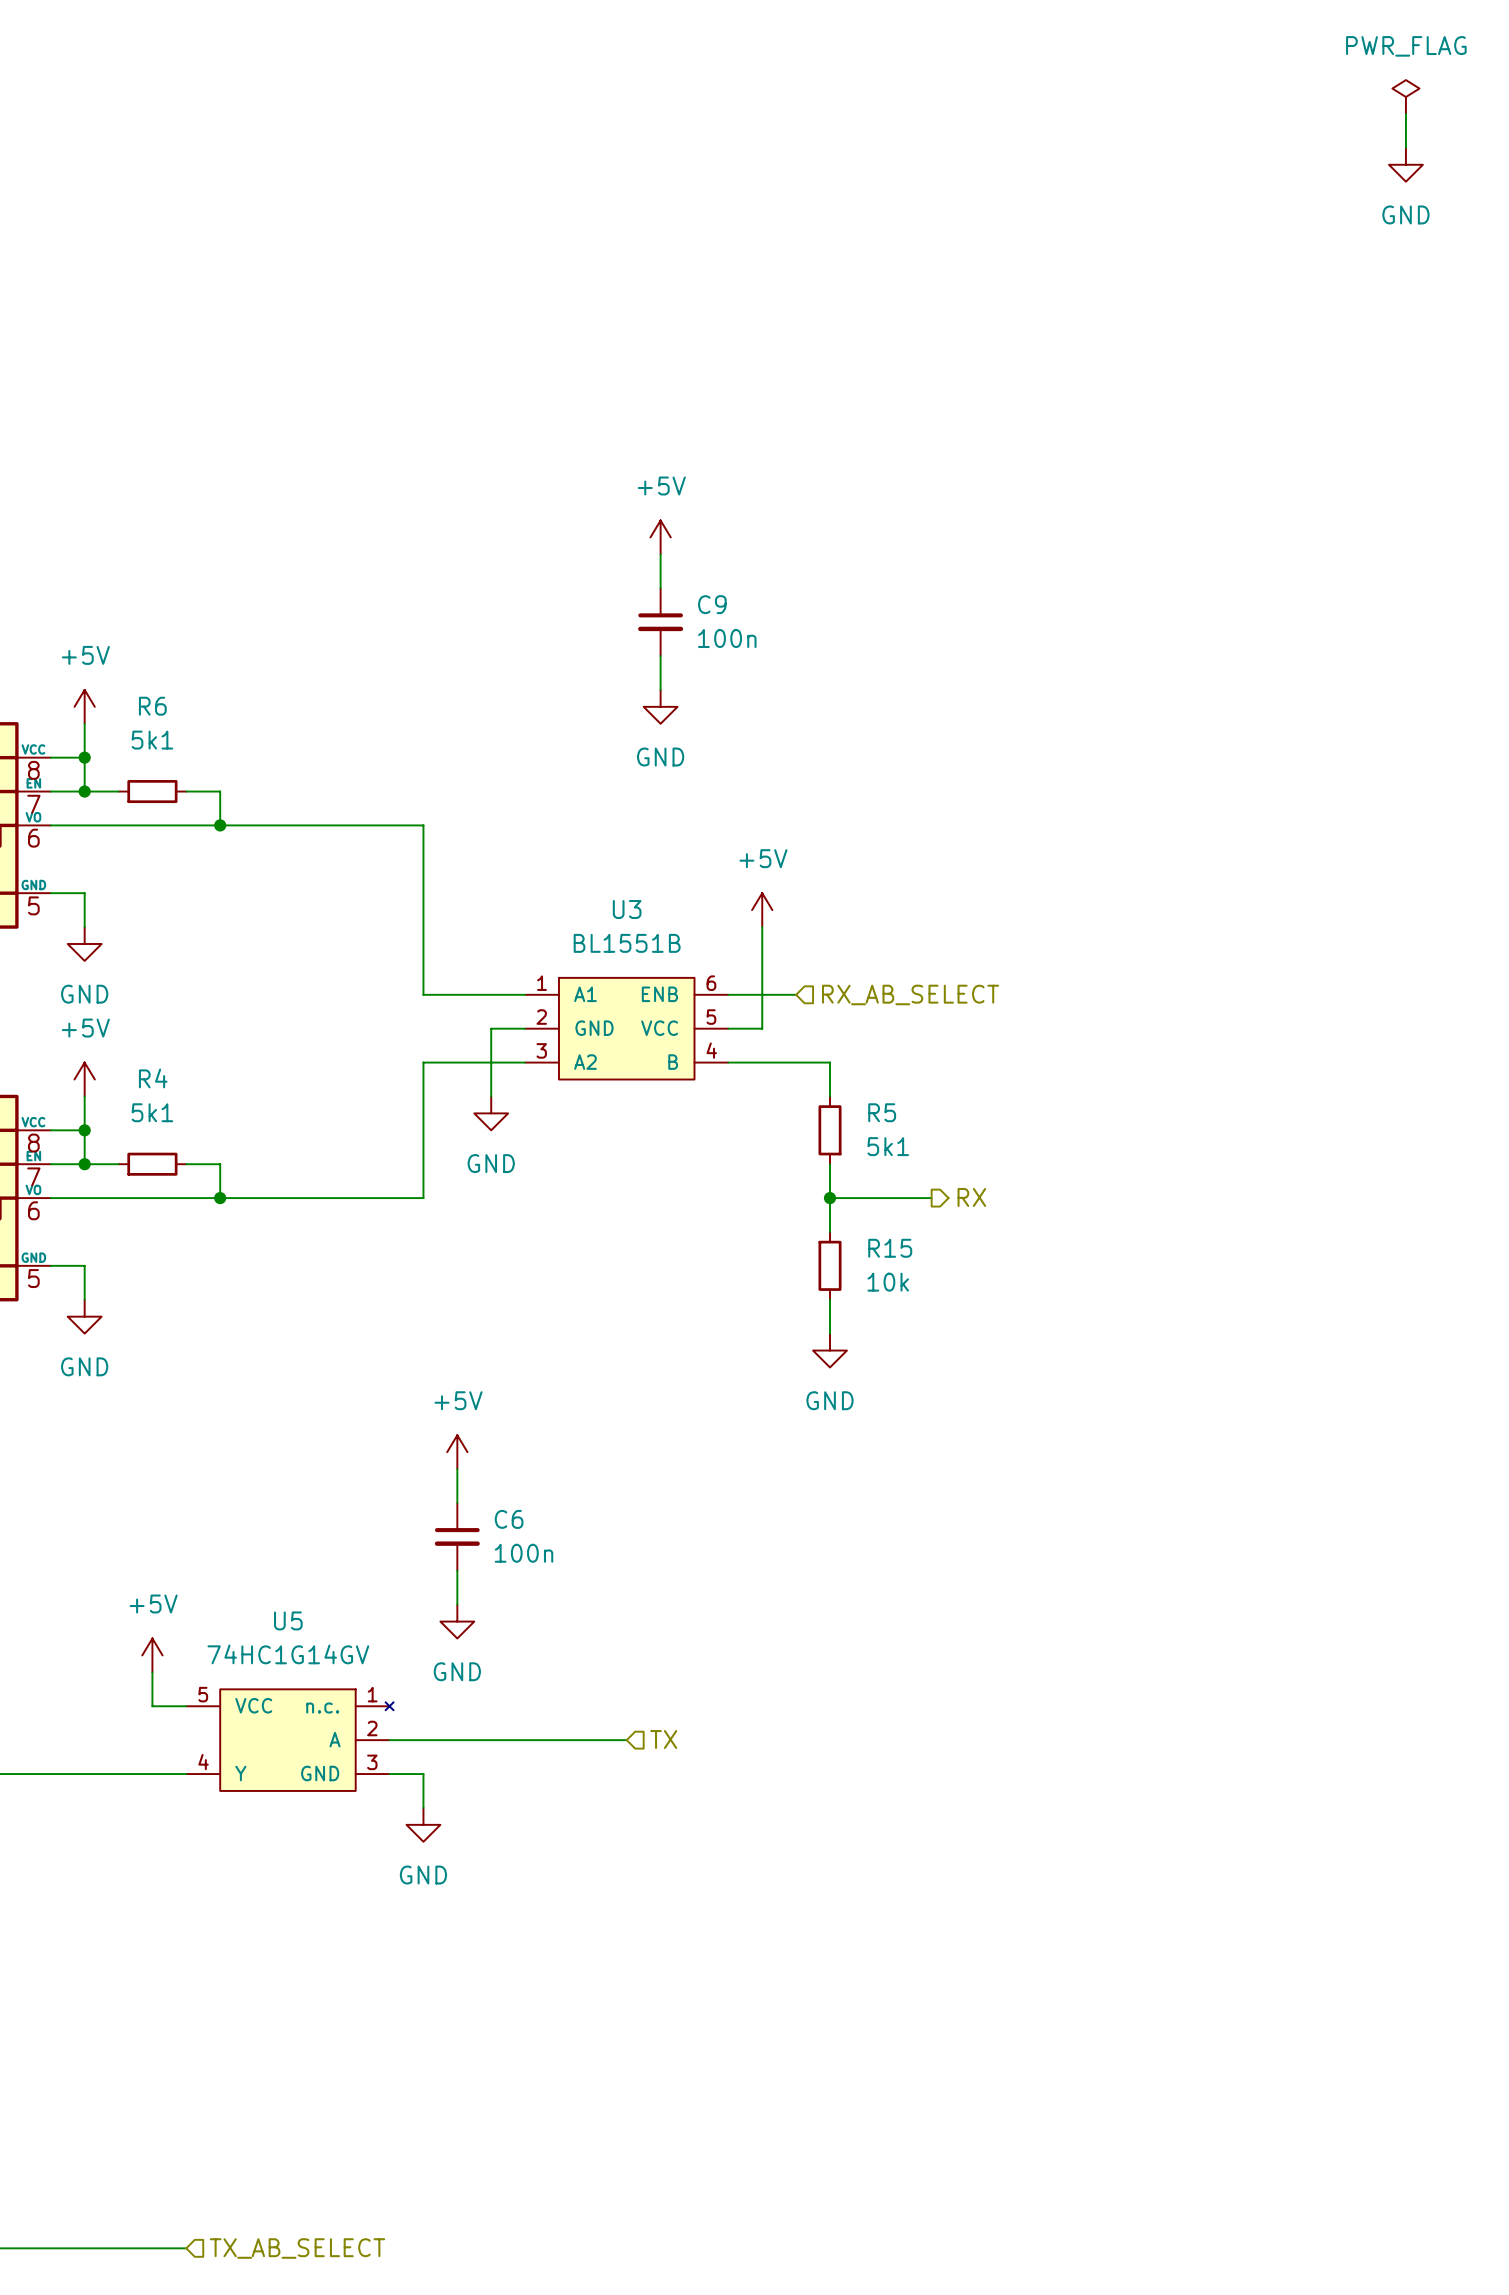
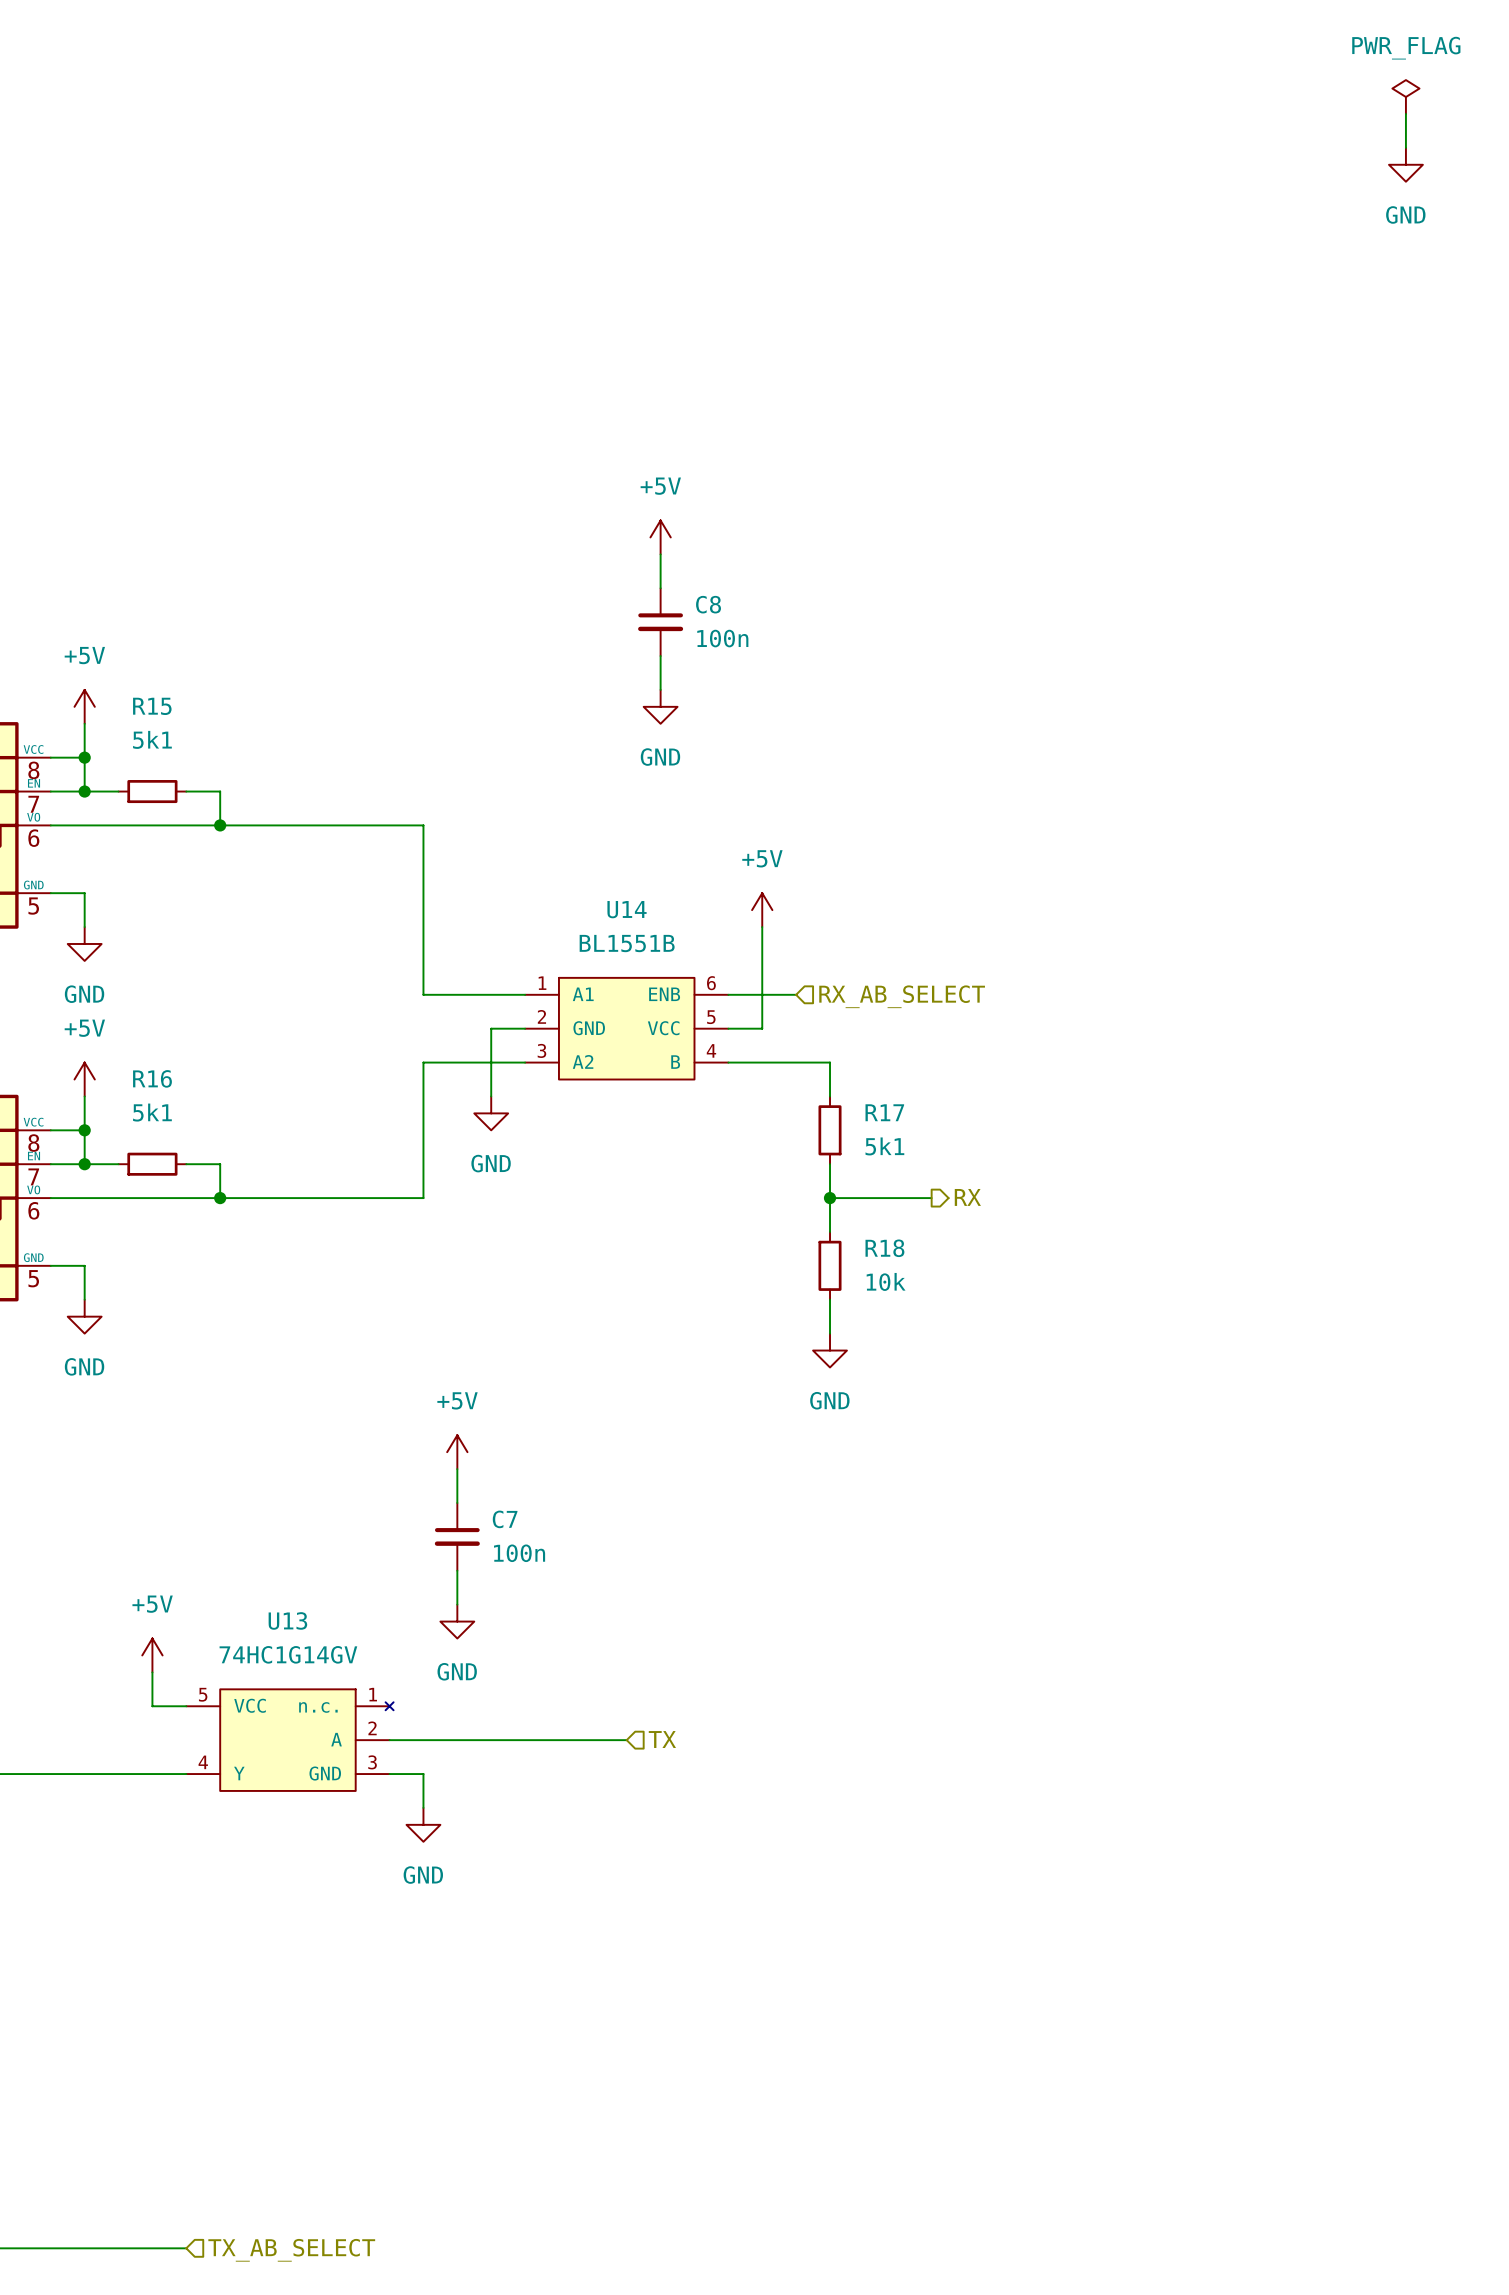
C9 name: C9 (712, 604) -> C8 (708, 604)
R6 name: R6 (152, 706) -> R15 (152, 706)
U3 name: U3 (627, 909) -> U14 (627, 909)
R4 name: R4 (153, 1078) -> R16 (152, 1078)
R5 name: R5 (882, 1112) -> R17 (884, 1112)
R15 name: R15 (890, 1248) -> R18 (884, 1248)
C6 name: C6 (509, 1519) -> C7 (505, 1519)
U5 name: U5 (288, 1620) -> U13 (287, 1620)

